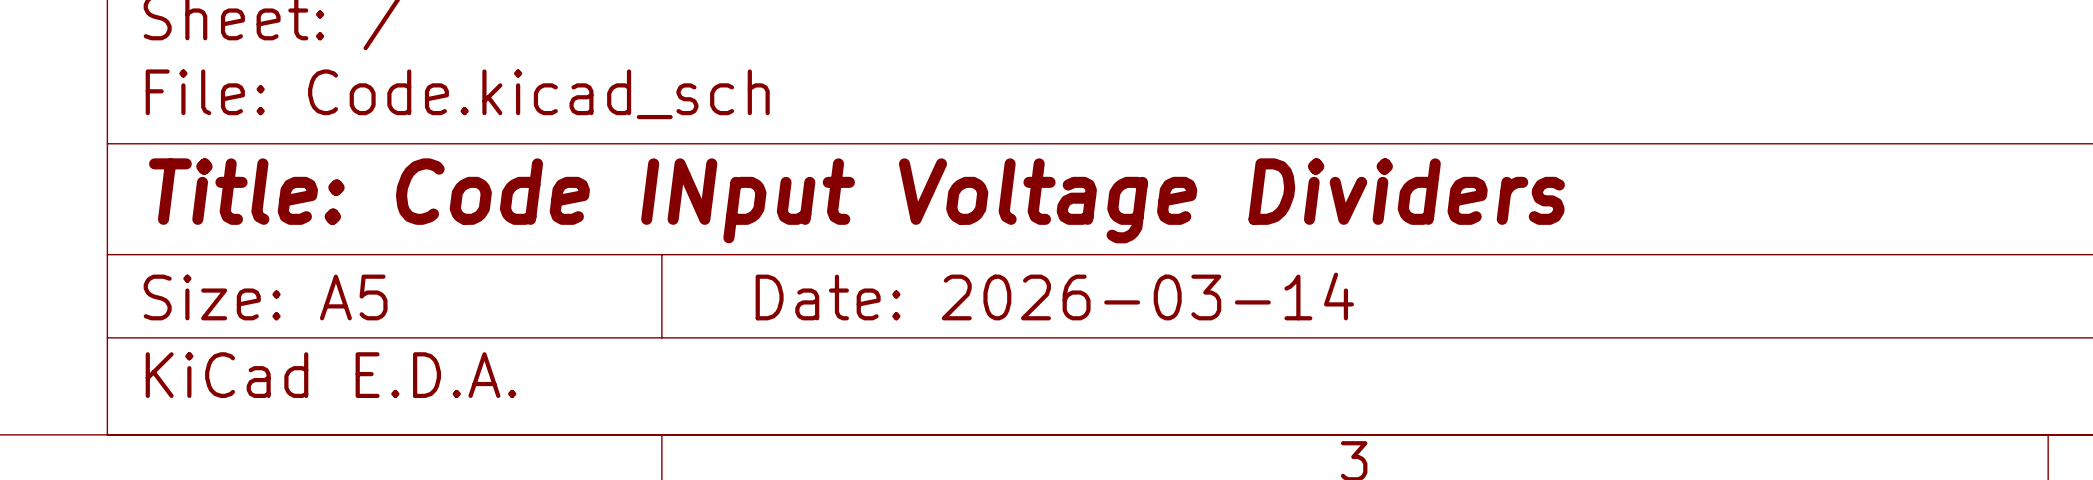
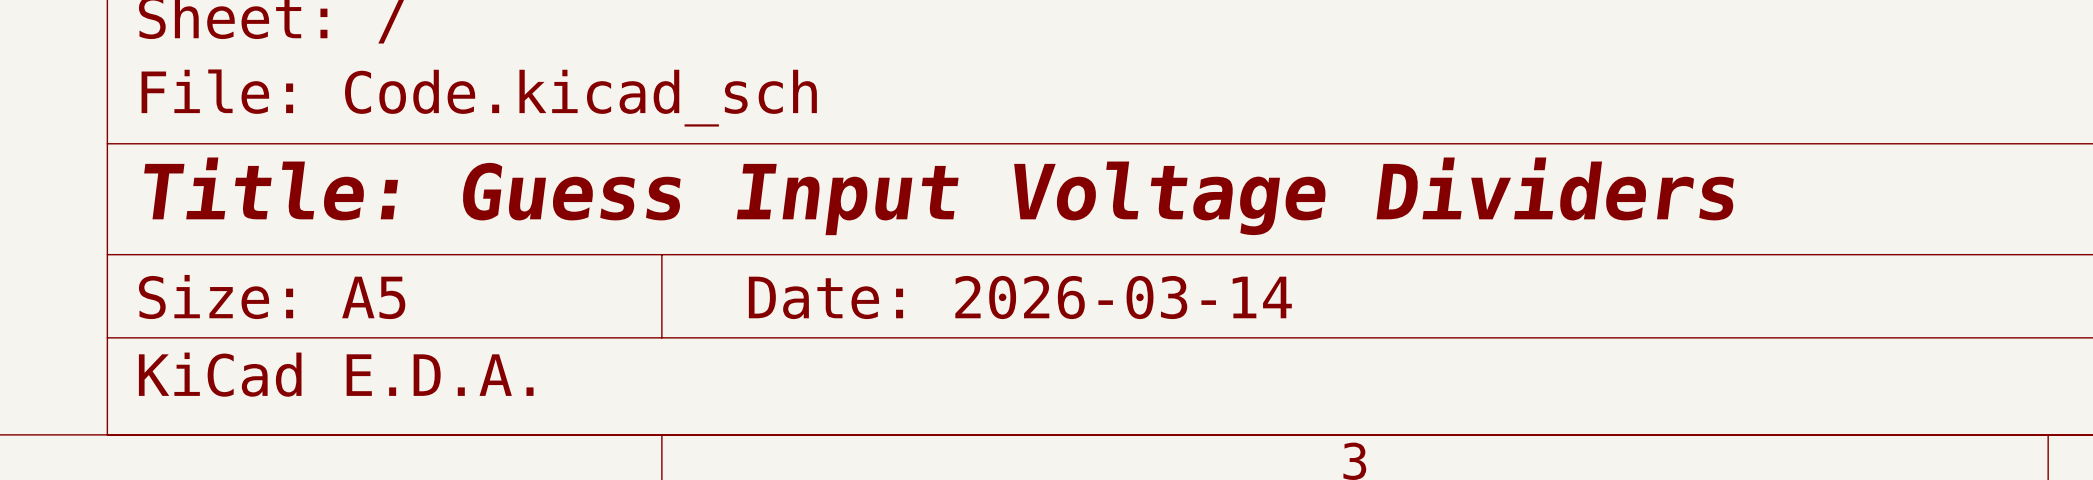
title block: Title: Code INput Voltage Dividers (856, 200) -> Title: Guess Input Voltage Dividers (939, 196)

